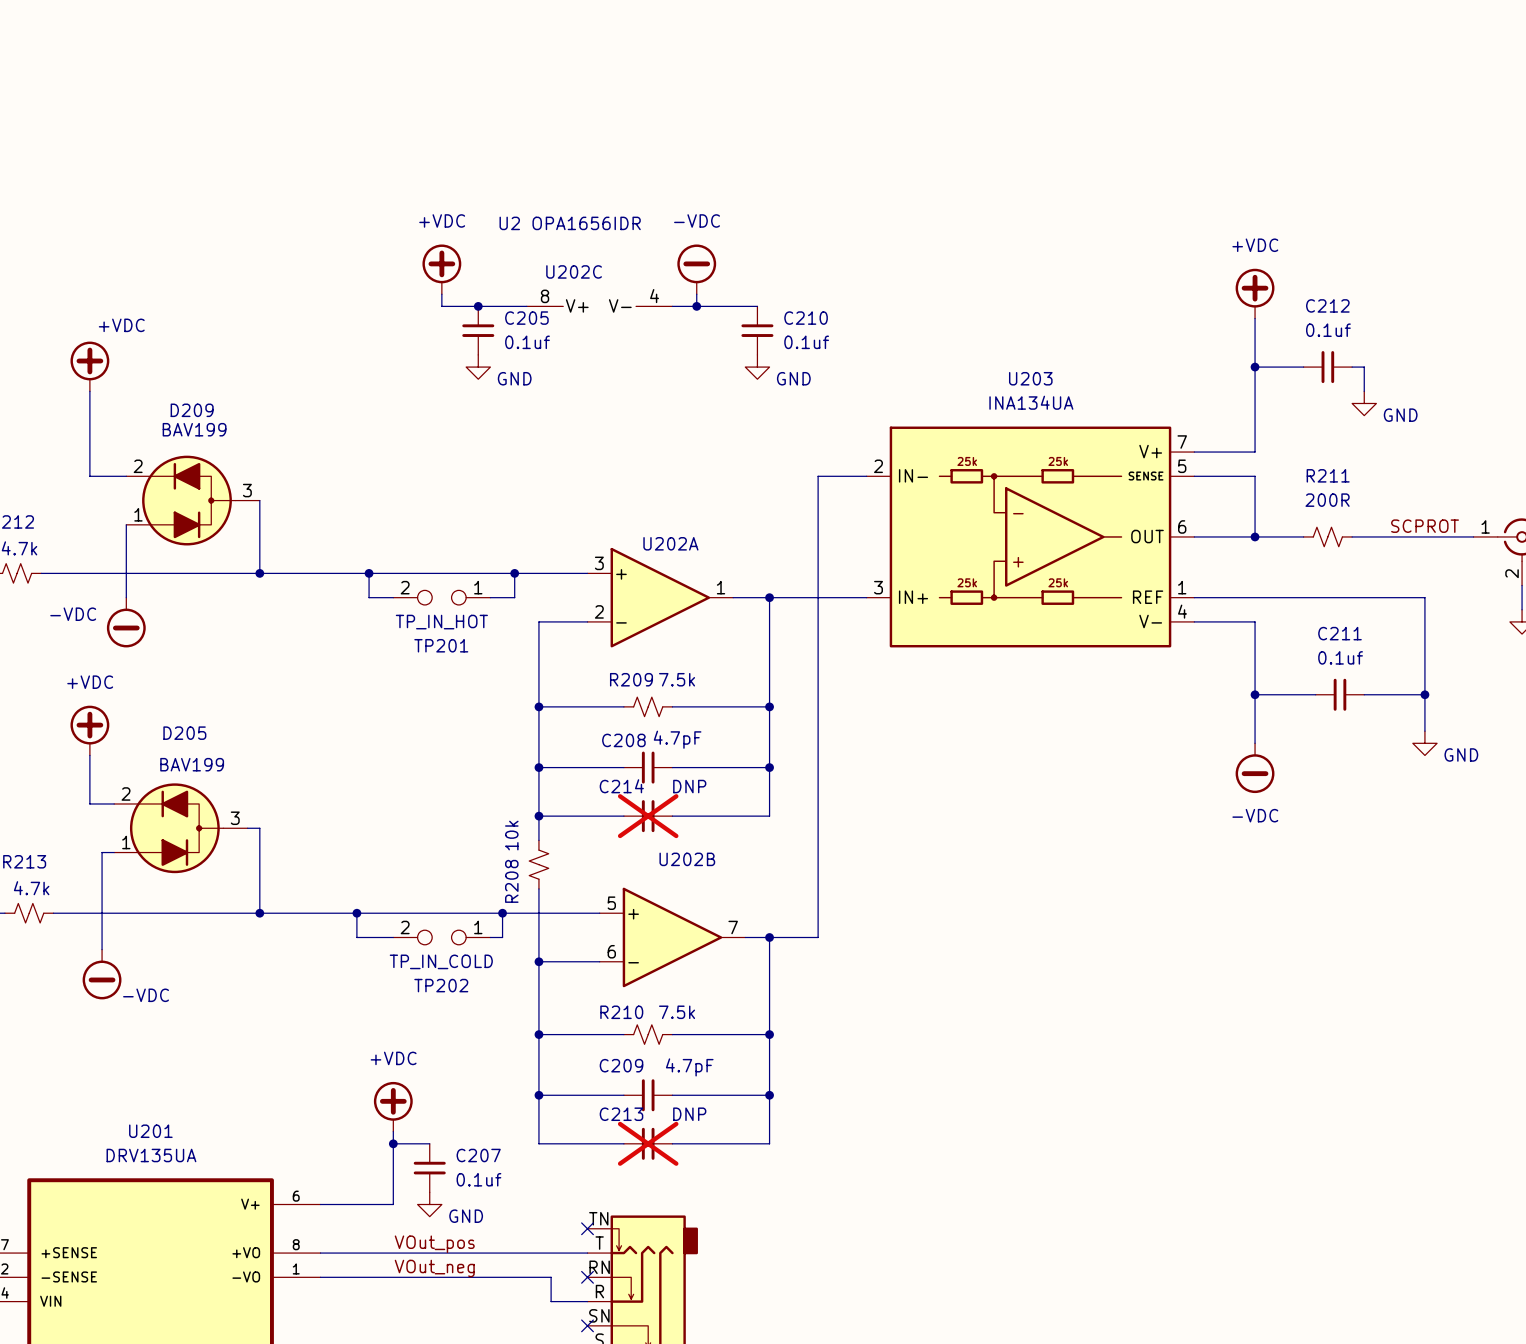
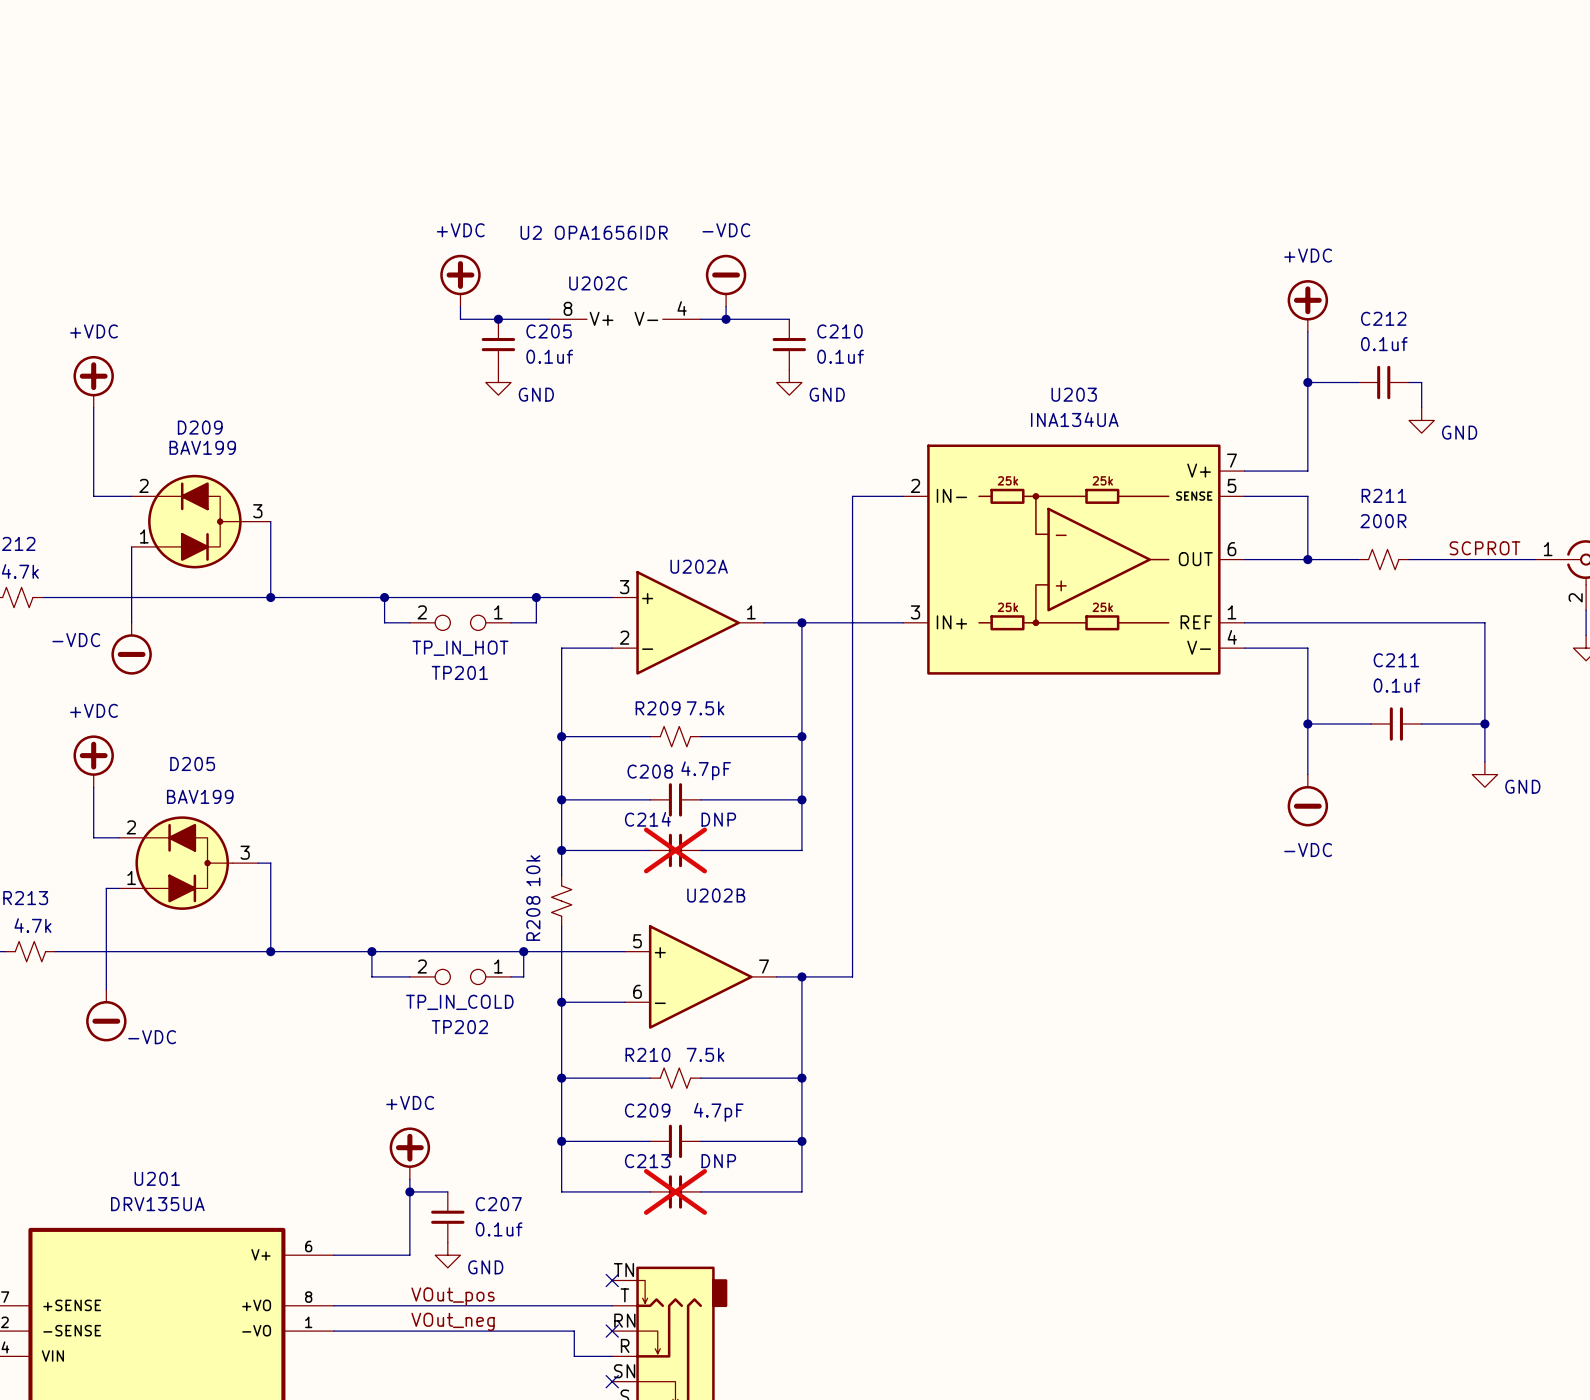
power symbol text position: +VDC (121, 325) -> +VDC (93, 331)

